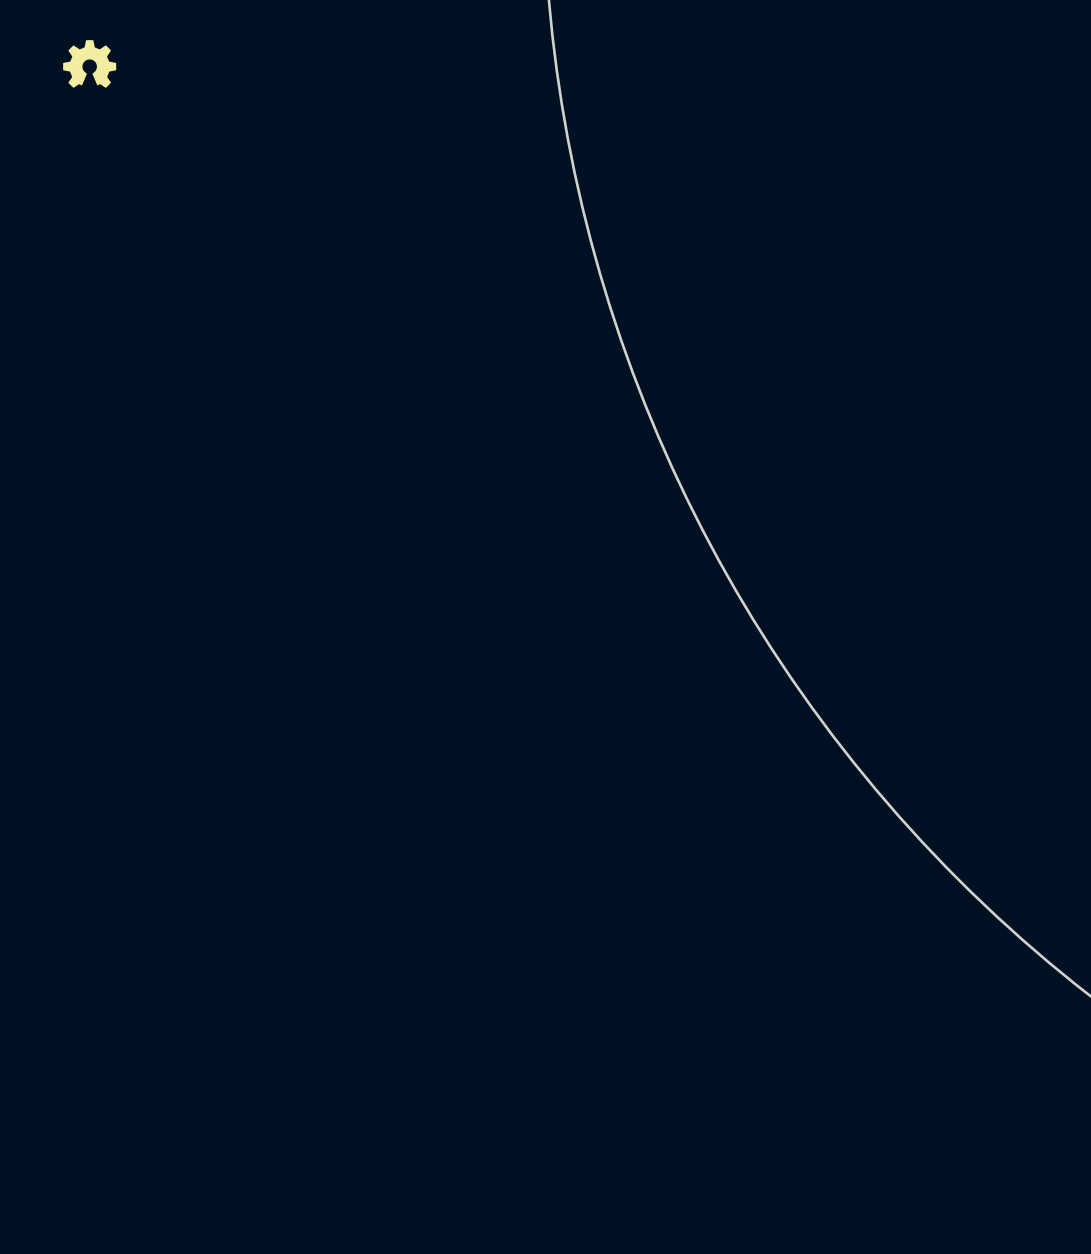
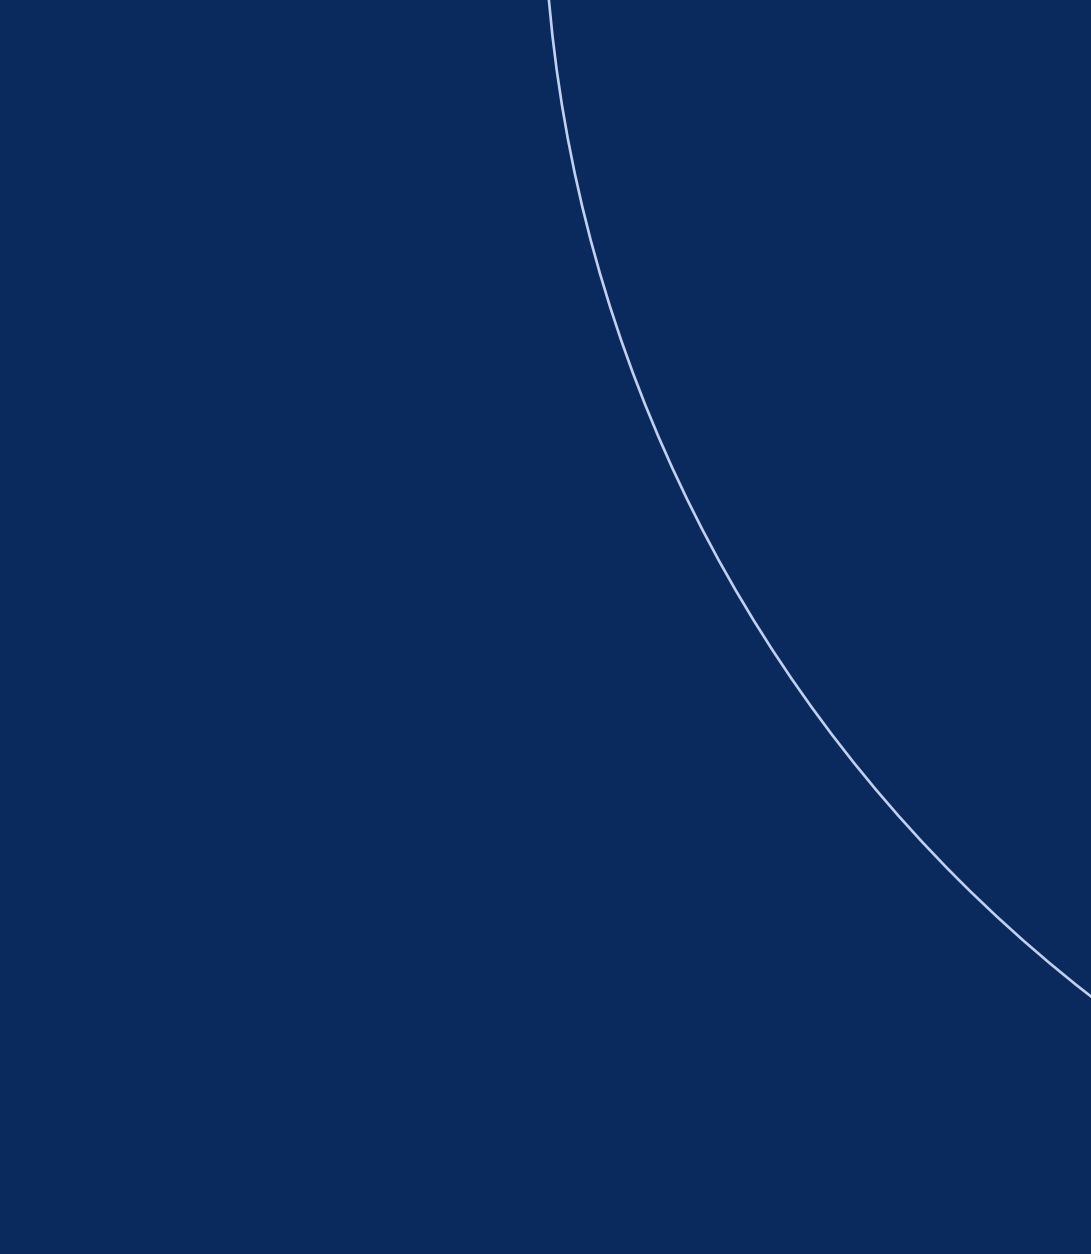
drawing: [63, 40, 117, 88] -> none

